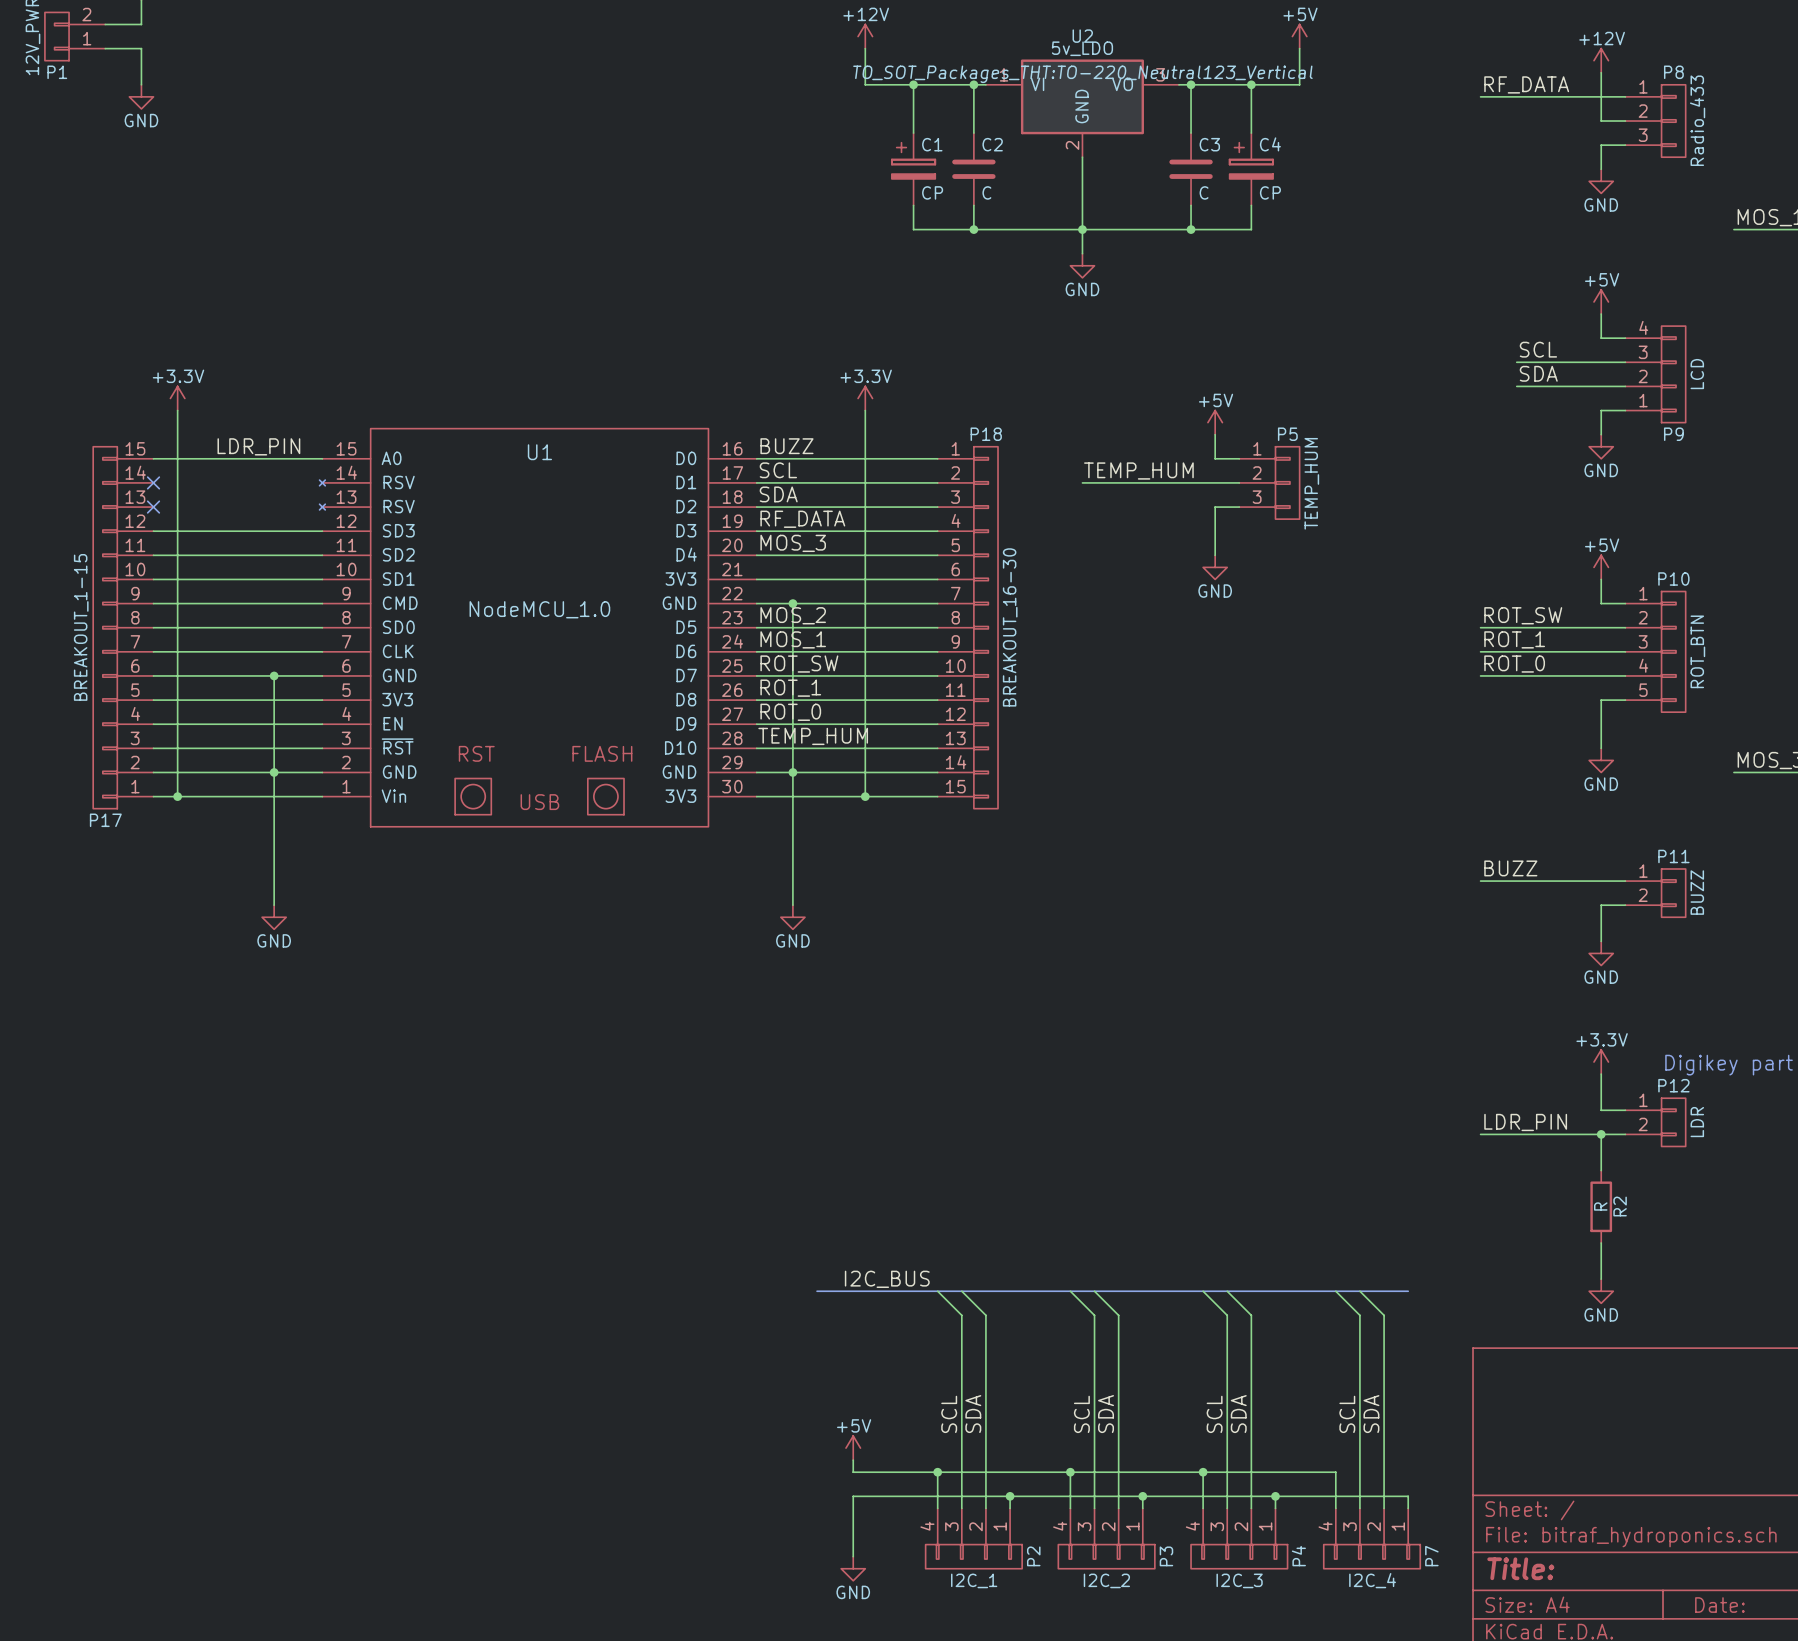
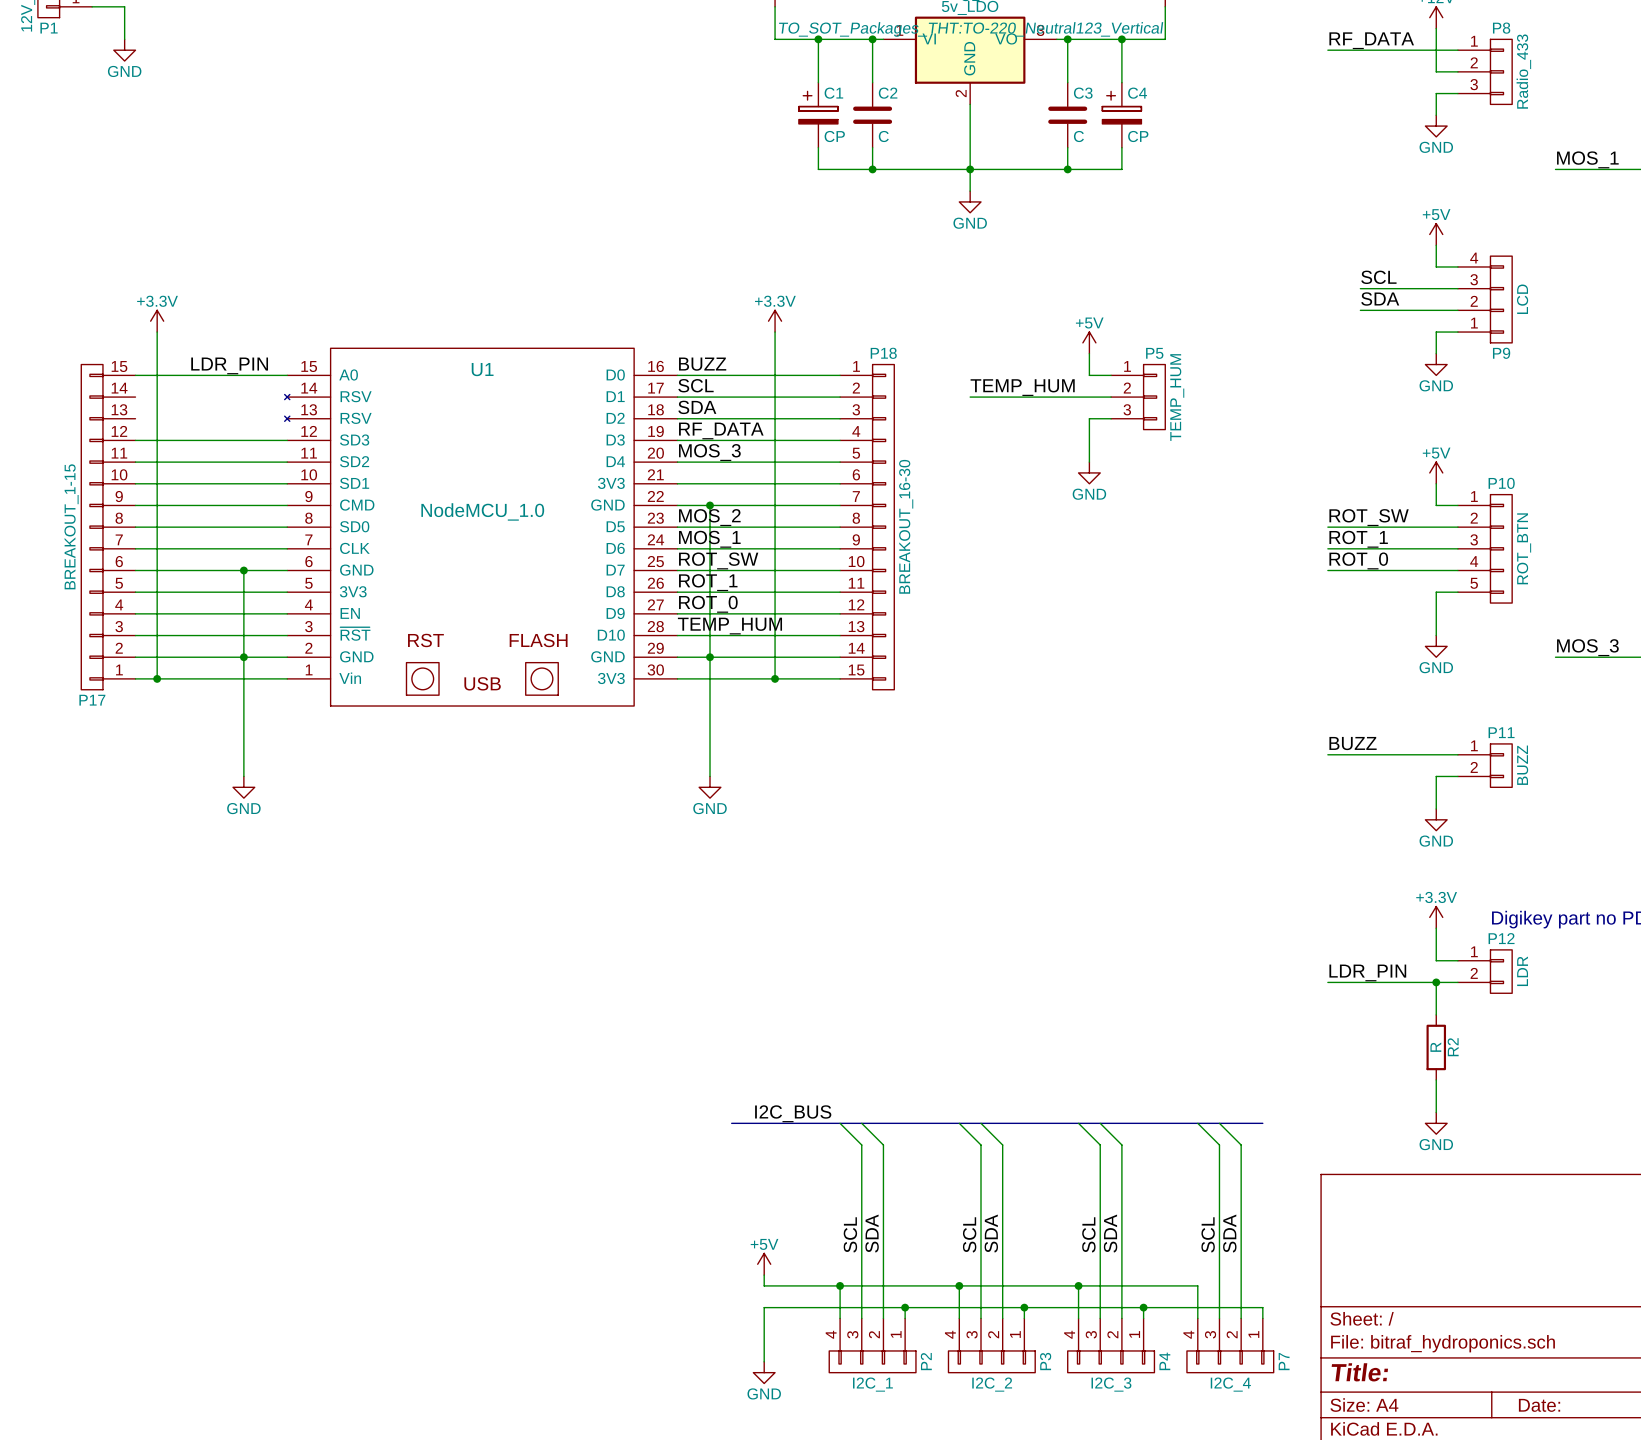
no-connect mark: (153, 482) -> none
no-connect mark: (153, 507) -> none

